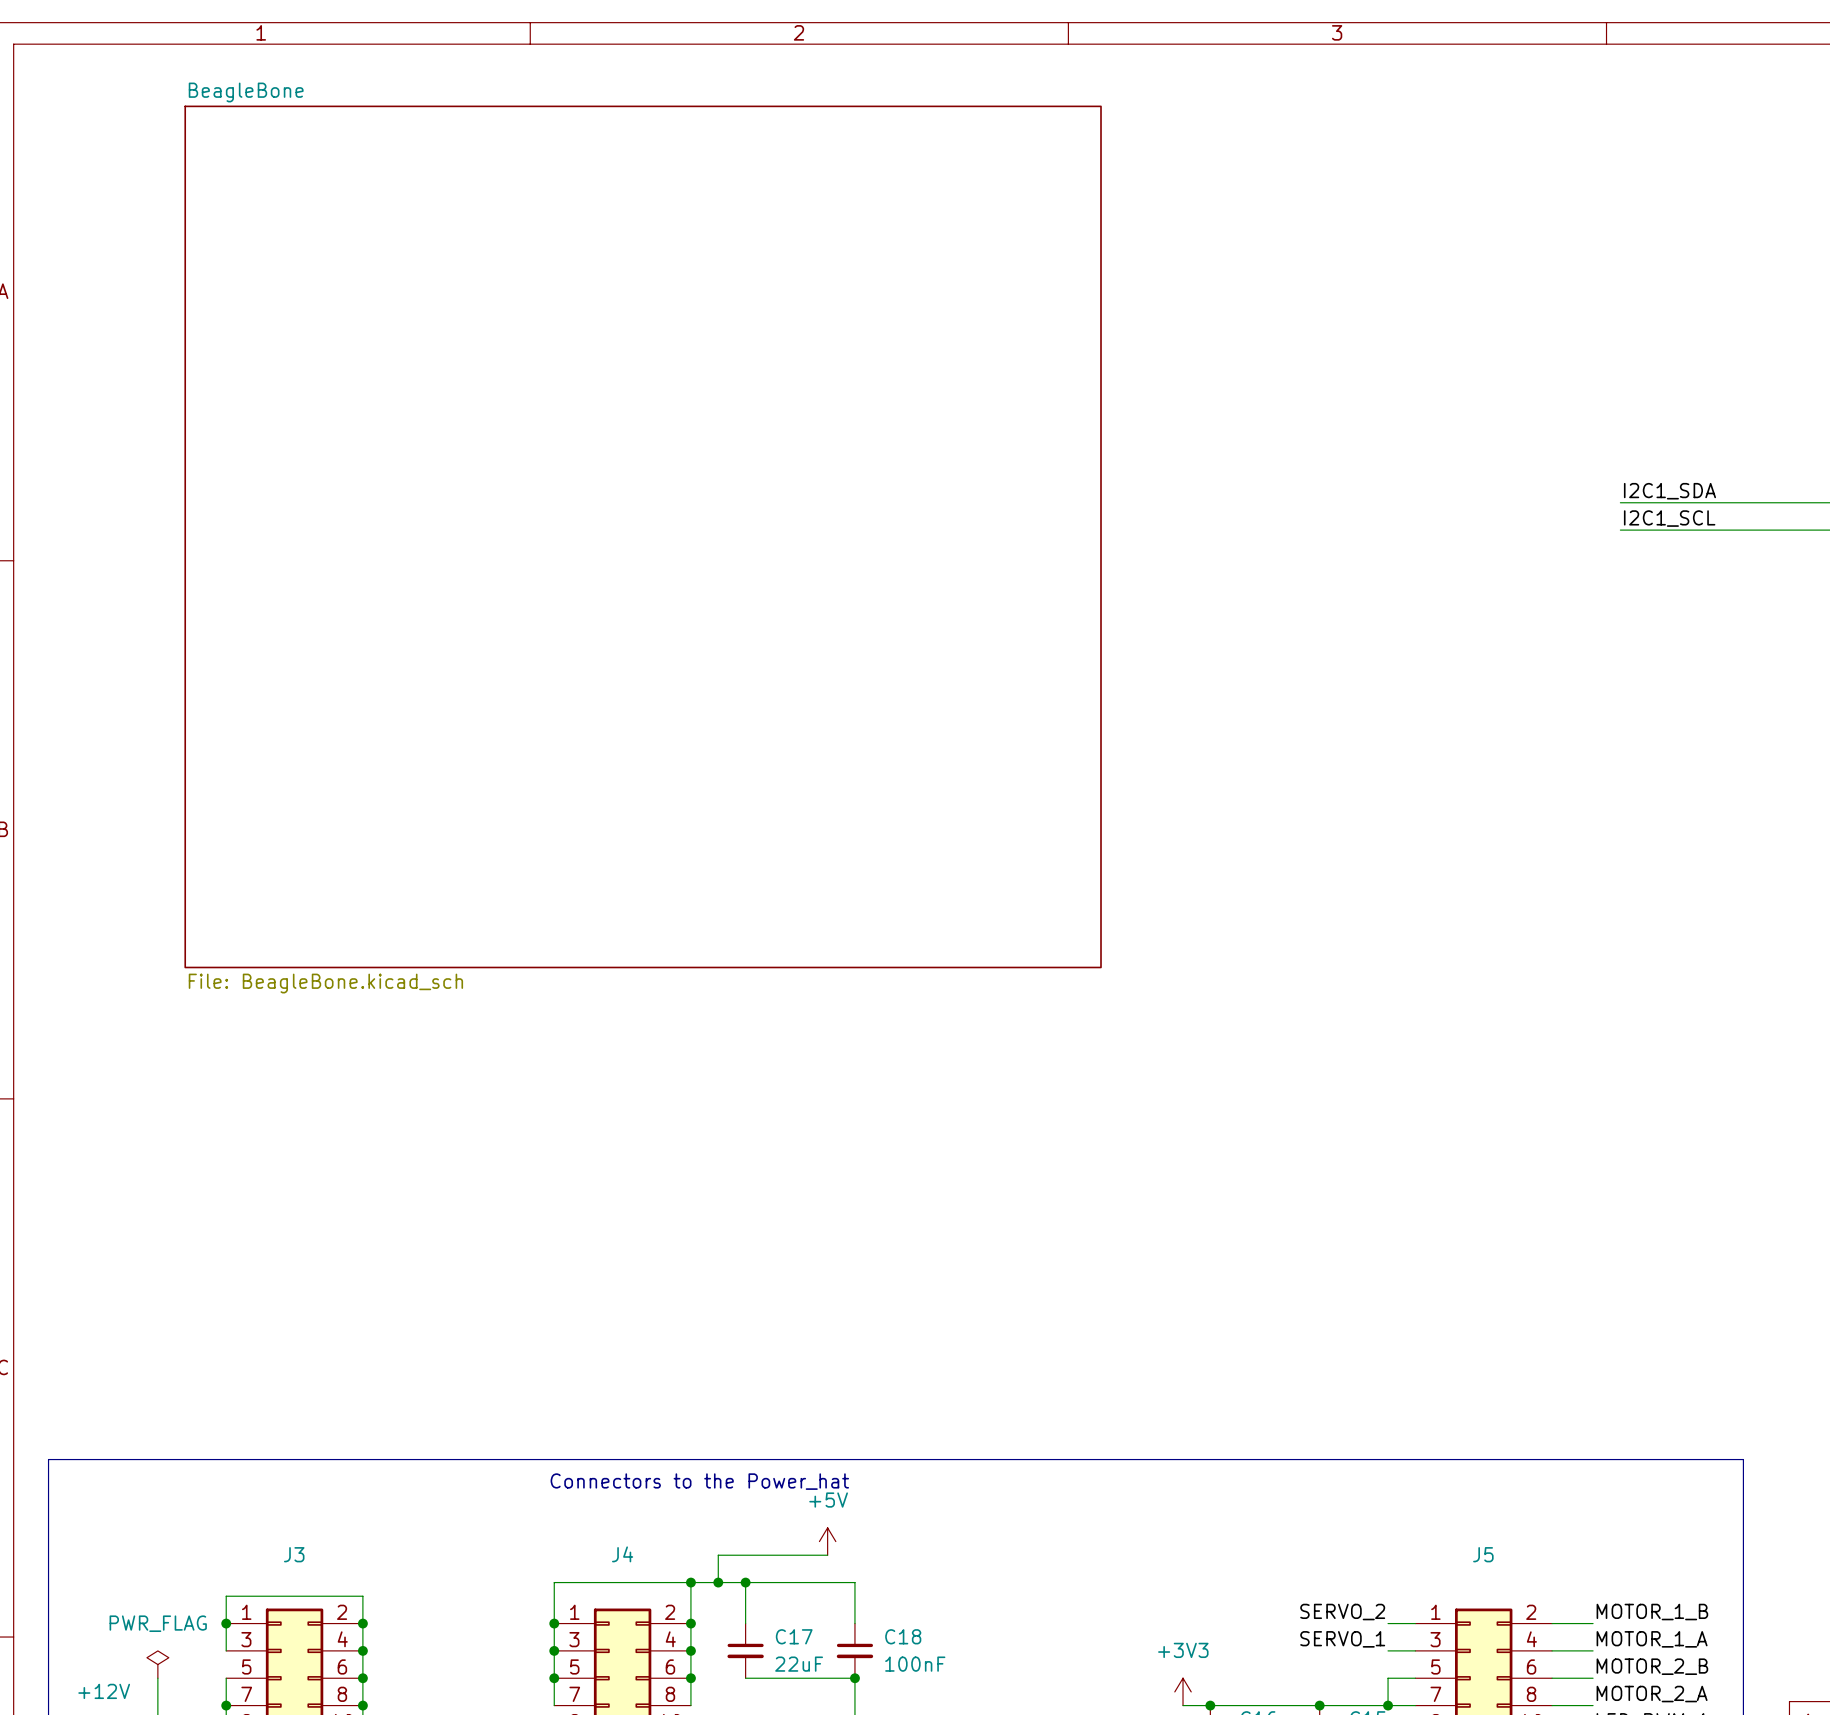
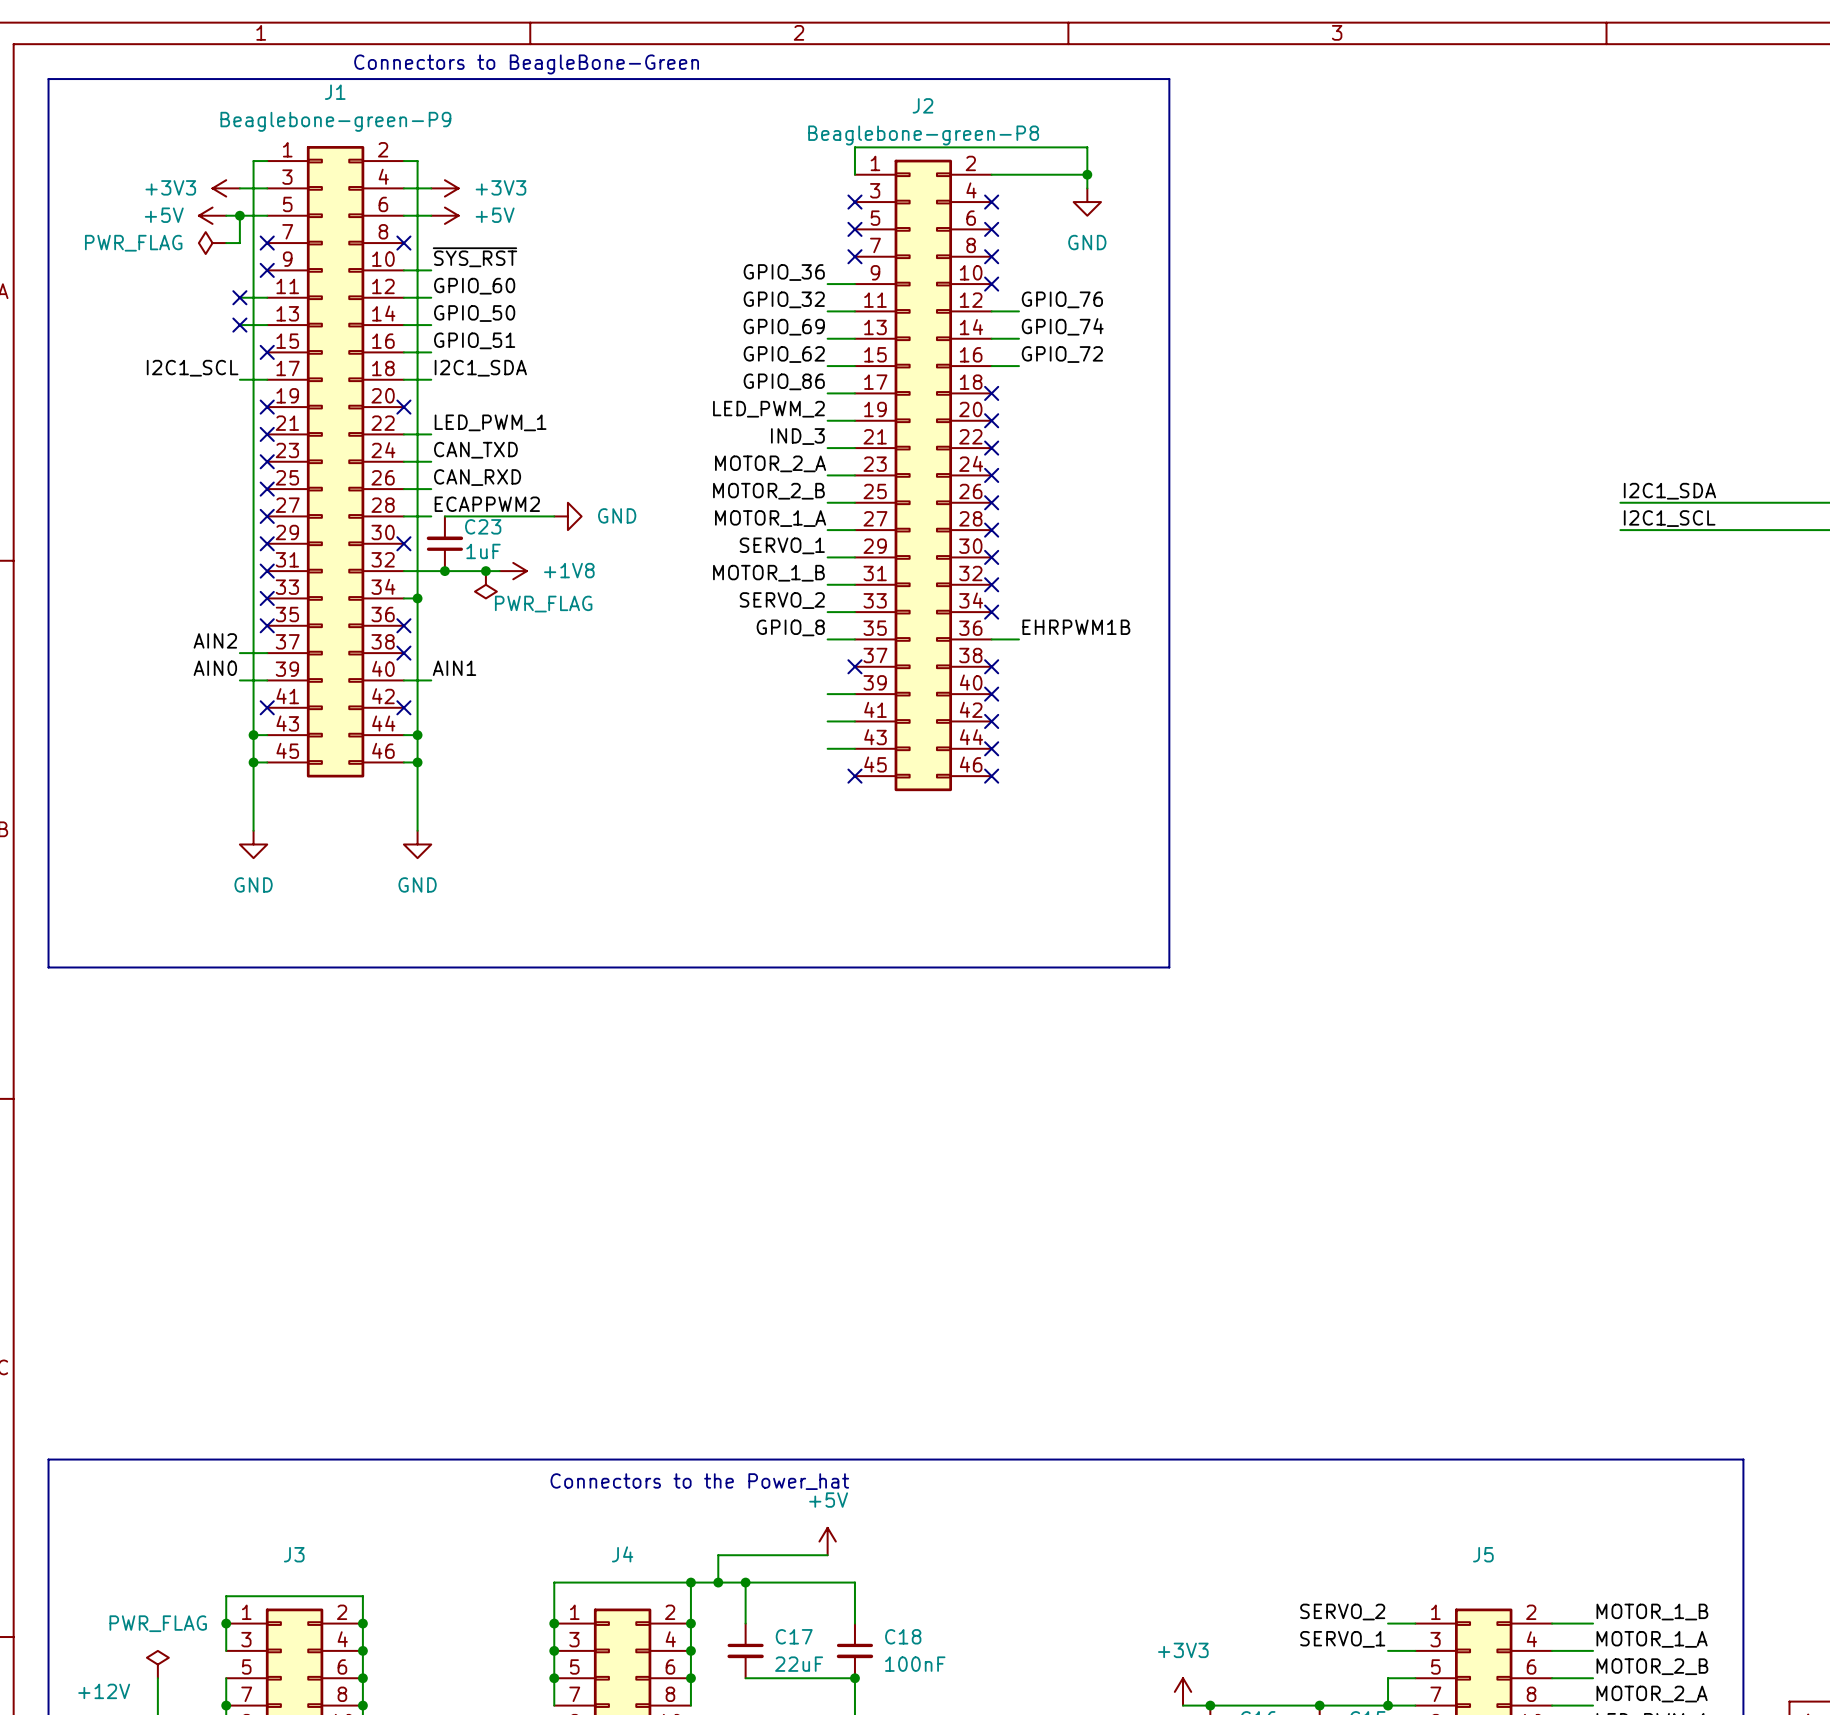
text: none -> Connectors to BeagleBone-Green (526, 64)
line: none -> (48, 79) (1169, 79) (1169, 967) (48, 967) (48, 79)
wire: none -> (267, 161) (253, 161) (253, 830)
wire: none -> (403, 161) (417, 161) (417, 830)
wire: none -> (854, 174) (854, 147) (1087, 147) (1087, 188)
wire: none -> (991, 174) (1087, 174)
junction: none -> (1087, 174)
power symbol: none -> +3V3 (226, 188)
wire: none -> (239, 188) (267, 188)
wire: none -> (403, 188) (431, 188)
power symbol: none -> +3V3 (444, 188)
no-connect mark: none -> (854, 202)
no-connect mark: none -> (991, 202)
power symbol: none -> GND (1087, 202)
power symbol: none -> +5V (212, 215)
wire: none -> (226, 215) (267, 215)
wire: none -> (239, 215) (239, 243) (226, 243)
junction: none -> (239, 215)
wire: none -> (403, 215) (431, 215)
power symbol: none -> +5V (444, 215)
no-connect mark: none -> (854, 229)
no-connect mark: none -> (991, 229)
power symbol: none -> PWR_FLAG (212, 243)
no-connect mark: none -> (267, 243)
no-connect mark: none -> (403, 243)
no-connect mark: none -> (854, 256)
no-connect mark: none -> (991, 256)
label: none -> ~{SYS_RST} (474, 257)
no-connect mark: none -> (267, 270)
wire: none -> (403, 270) (431, 270)
label: none -> GPIO_36 (784, 272)
wire: none -> (827, 284) (854, 284)
no-connect mark: none -> (991, 284)
label: none -> GPIO_60 (474, 286)
wire: none -> (239, 297) (267, 297)
no-connect mark: none -> (239, 297)
wire: none -> (403, 297) (431, 297)
label: none -> GPIO_32 (784, 299)
label: none -> GPIO_76 (1062, 299)
wire: none -> (827, 311) (854, 311)
wire: none -> (991, 311) (1018, 311)
label: none -> GPIO_50 (474, 313)
wire: none -> (239, 325) (267, 325)
no-connect mark: none -> (239, 325)
wire: none -> (403, 325) (431, 325)
label: none -> GPIO_74 (1062, 326)
label: none -> GPIO_69 (784, 327)
wire: none -> (827, 338) (854, 338)
wire: none -> (991, 338) (1018, 338)
label: none -> GPIO_51 (474, 340)
no-connect mark: none -> (267, 352)
wire: none -> (403, 352) (431, 352)
label: none -> GPIO_62 (784, 354)
label: none -> GPIO_72 (1062, 354)
wire: none -> (827, 366) (854, 366)
wire: none -> (991, 366) (1018, 366)
label: none -> I2C1_SCL (192, 368)
label: none -> I2C1_SDA (480, 368)
wire: none -> (239, 379) (267, 379)
wire: none -> (403, 379) (431, 379)
label: none -> GPIO_86 (784, 381)
wire: none -> (827, 393) (854, 393)
no-connect mark: none -> (991, 393)
no-connect mark: none -> (267, 407)
no-connect mark: none -> (403, 407)
label: none -> LED_PWM_2 (768, 409)
wire: none -> (827, 420) (854, 420)
no-connect mark: none -> (991, 420)
label: none -> LED_PWM_1 (490, 422)
no-connect mark: none -> (267, 434)
wire: none -> (403, 434) (431, 434)
label: none -> IND_3 (797, 436)
wire: none -> (827, 448) (854, 448)
no-connect mark: none -> (991, 448)
label: none -> CAN_TXD (475, 450)
no-connect mark: none -> (267, 461)
J1: none -> Beaglebone-green-P9 (335, 461)
wire: none -> (403, 461) (431, 461)
label: none -> MOTOR_2_A (770, 463)
wire: none -> (827, 475) (854, 475)
J2: none -> Beaglebone-green-P8 (923, 475)
no-connect mark: none -> (991, 475)
label: none -> CAN_RXD (477, 477)
no-connect mark: none -> (267, 489)
wire: none -> (403, 489) (431, 489)
label: none -> MOTOR_2_B (768, 491)
wire: none -> (827, 502) (854, 502)
no-connect mark: none -> (991, 502)
label: none -> ECAPPWM2 (487, 504)
no-connect mark: none -> (267, 516)
wire: none -> (403, 516) (431, 516)
wire: none -> (444, 516) (554, 516)
power symbol: none -> GND (567, 516)
label: none -> MOTOR_1_A (770, 518)
wire: none -> (827, 530) (854, 530)
no-connect mark: none -> (991, 530)
sheet BeagleBone: File: BeagleBone.kicad_sch (643, 536) -> none
no-connect mark: none -> (267, 543)
no-connect mark: none -> (403, 543)
C23: none -> 1uF (444, 543)
label: none -> SERVO_1 (782, 545)
wire: none -> (827, 557) (854, 557)
no-connect mark: none -> (991, 557)
no-connect mark: none -> (267, 571)
wire: none -> (403, 571) (499, 571)
junction: none -> (444, 571)
junction: none -> (485, 571)
power symbol: none -> +1V8 (513, 571)
label: none -> MOTOR_1_B (768, 573)
power symbol: none -> PWR_FLAG (485, 584)
wire: none -> (827, 584) (854, 584)
no-connect mark: none -> (991, 584)
no-connect mark: none -> (267, 598)
wire: none -> (403, 598) (417, 598)
junction: none -> (417, 598)
label: none -> SERVO_2 (782, 600)
wire: none -> (827, 612) (854, 612)
no-connect mark: none -> (991, 612)
no-connect mark: none -> (267, 625)
no-connect mark: none -> (403, 625)
label: none -> GPIO_8 (790, 627)
label: none -> EHRPWM1B (1076, 627)
wire: none -> (827, 639) (854, 639)
wire: none -> (991, 639) (1018, 639)
label: none -> AIN2 (215, 640)
wire: none -> (239, 653) (267, 653)
no-connect mark: none -> (403, 653)
no-connect mark: none -> (854, 666)
no-connect mark: none -> (991, 666)
label: none -> AIN0 (215, 668)
label: none -> AIN1 (454, 668)
wire: none -> (239, 680) (267, 680)
wire: none -> (403, 680) (431, 680)
wire: none -> (827, 694) (854, 694)
no-connect mark: none -> (991, 694)
no-connect mark: none -> (267, 707)
no-connect mark: none -> (403, 707)
wire: none -> (827, 721) (854, 721)
no-connect mark: none -> (991, 721)
wire: none -> (253, 735) (267, 735)
junction: none -> (253, 735)
wire: none -> (403, 735) (417, 735)
junction: none -> (417, 735)
wire: none -> (827, 748) (854, 748)
no-connect mark: none -> (991, 748)
wire: none -> (253, 762) (267, 762)
junction: none -> (253, 762)
wire: none -> (403, 762) (417, 762)
junction: none -> (417, 762)
no-connect mark: none -> (854, 776)
no-connect mark: none -> (991, 776)
power symbol: none -> GND (253, 844)
power symbol: none -> GND (417, 844)

